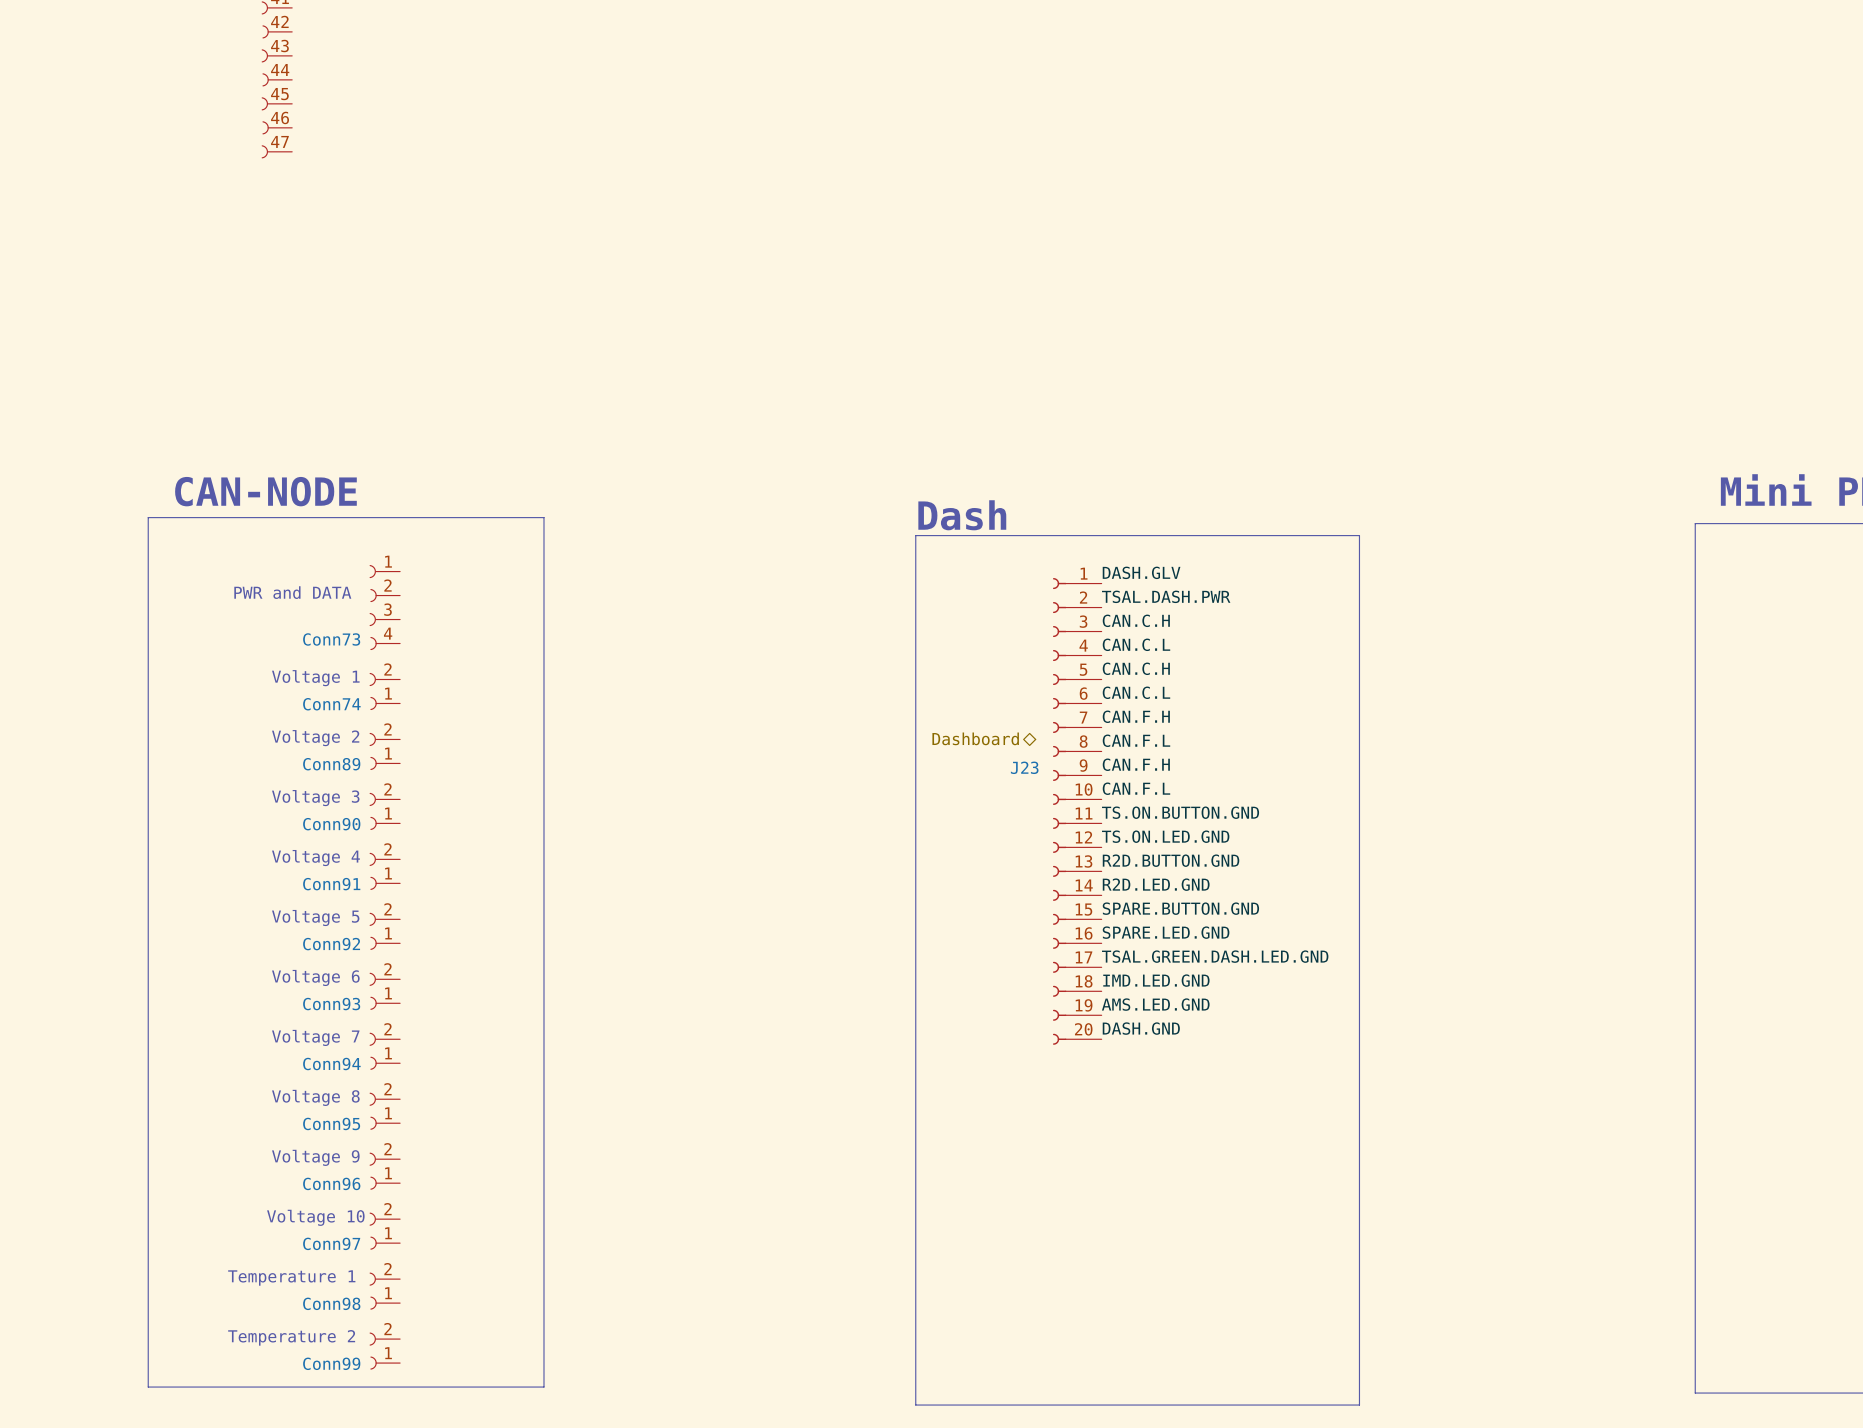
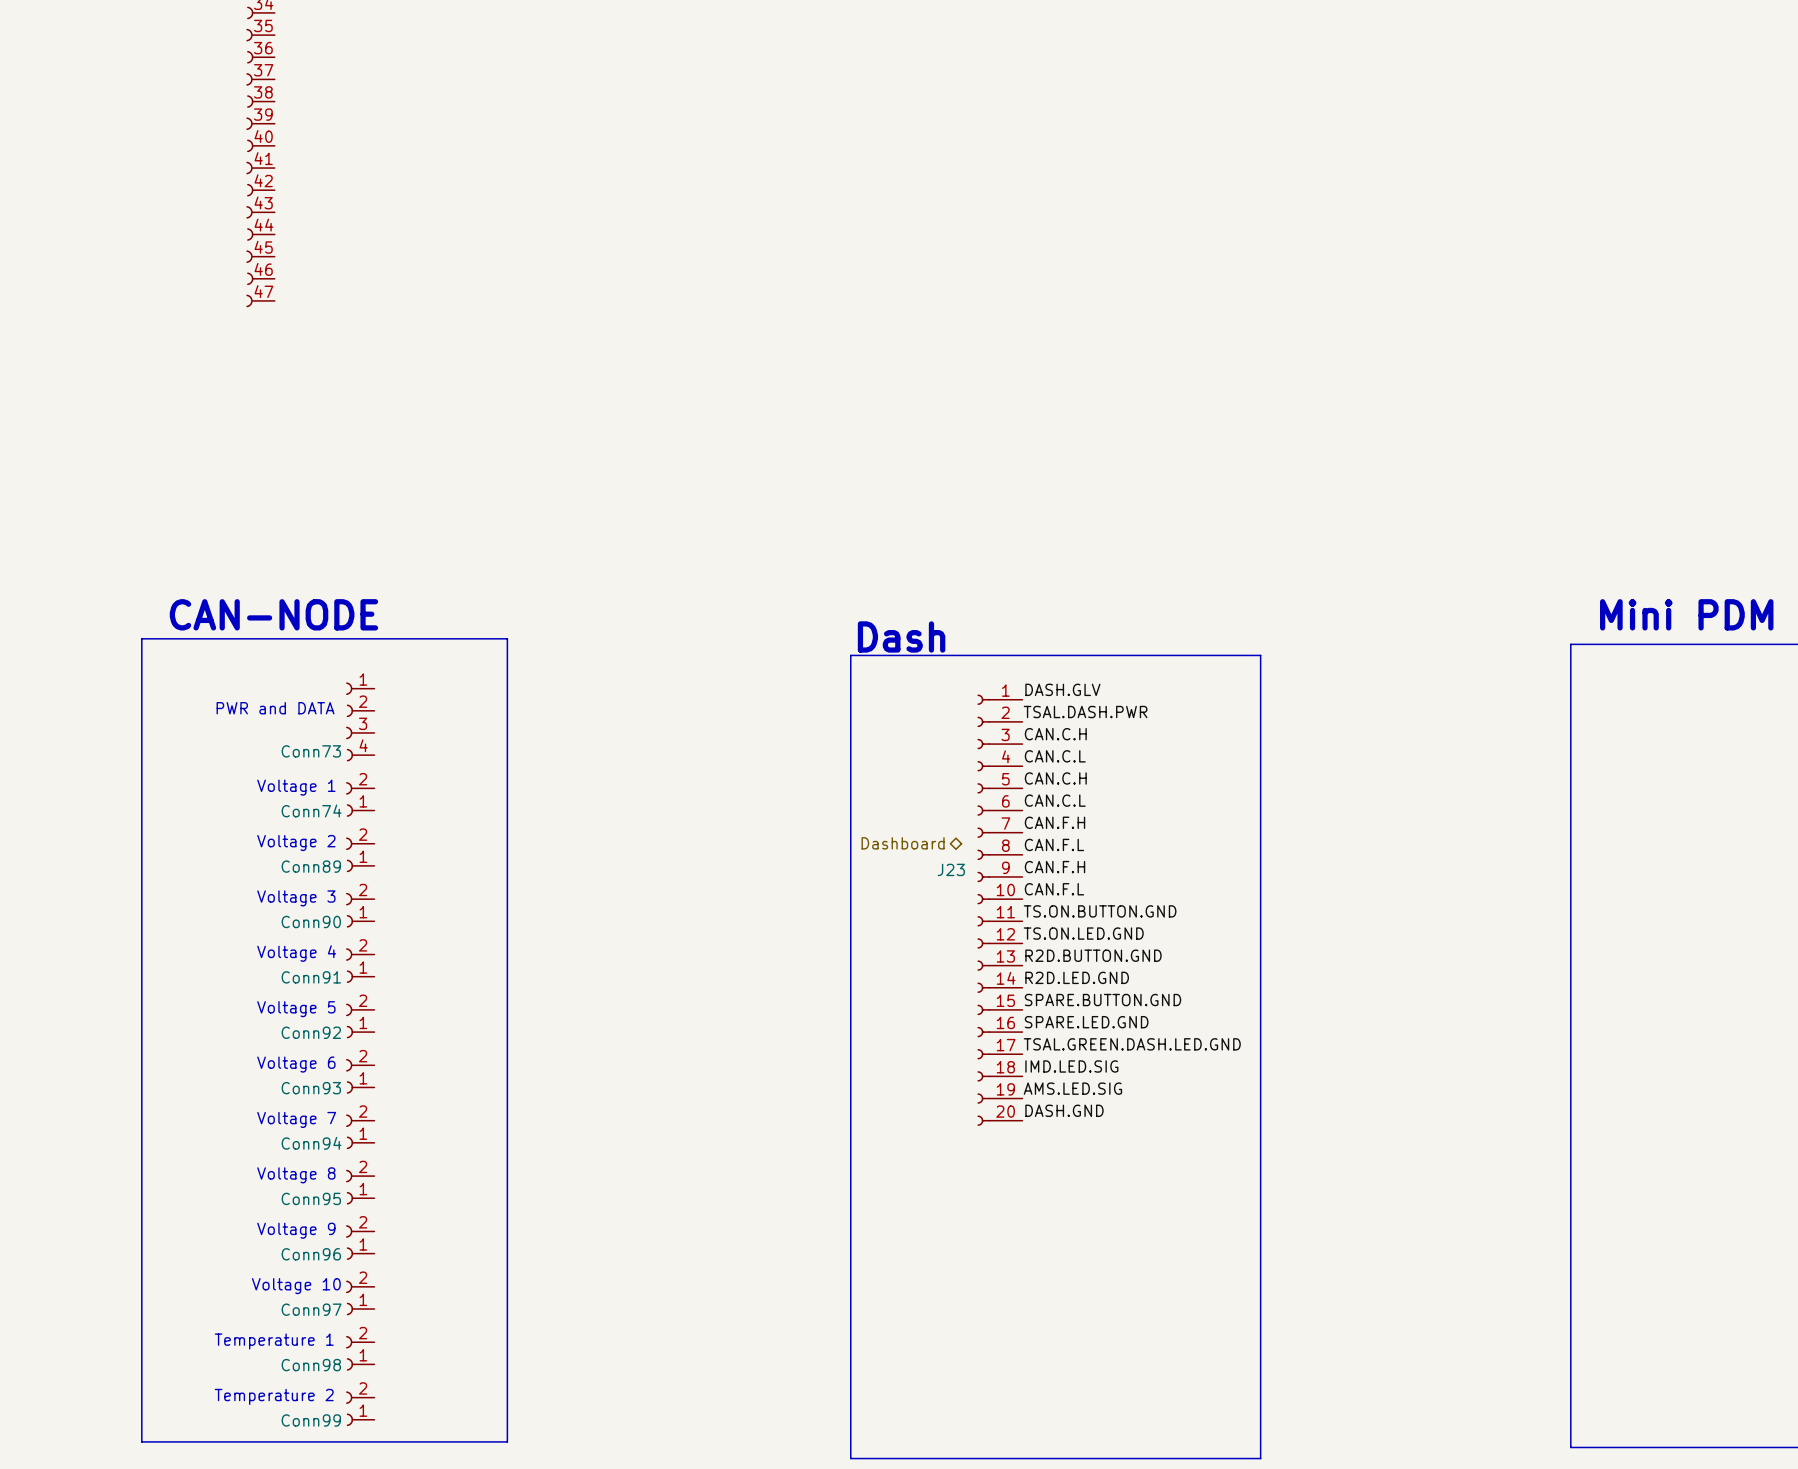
label: IMD.LED.GND (1156, 980) -> IMD.LED.SIG (1071, 1066)
label: AMS.LED.GND (1155, 1004) -> AMS.LED.SIG (1072, 1088)

